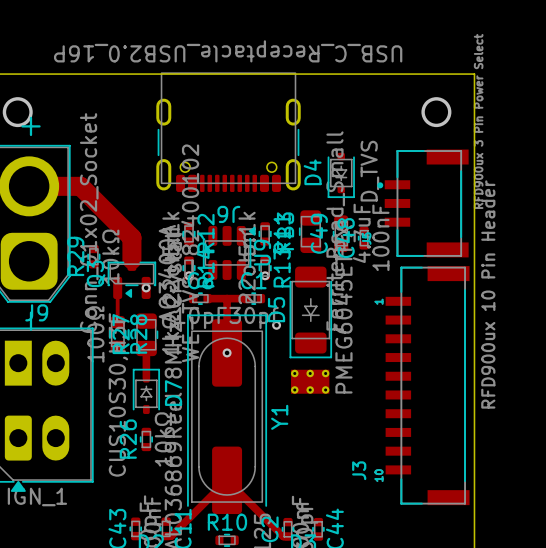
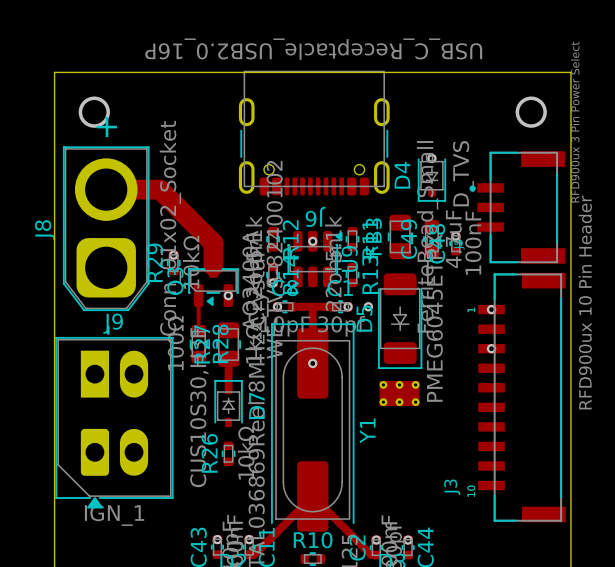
via: none -> (431, 158)
via: none -> (455, 236)
via: none -> (312, 241)
via: none -> (173, 255)
via: (265, 275) -> none
via: none -> (277, 306)
via: none -> (348, 306)
via: none -> (368, 306)
via: none -> (491, 309)
via: (276, 325) -> none
via: none -> (491, 348)
via: none -> (217, 539)
via: none -> (249, 539)
via: none -> (376, 540)
via: none -> (408, 540)

